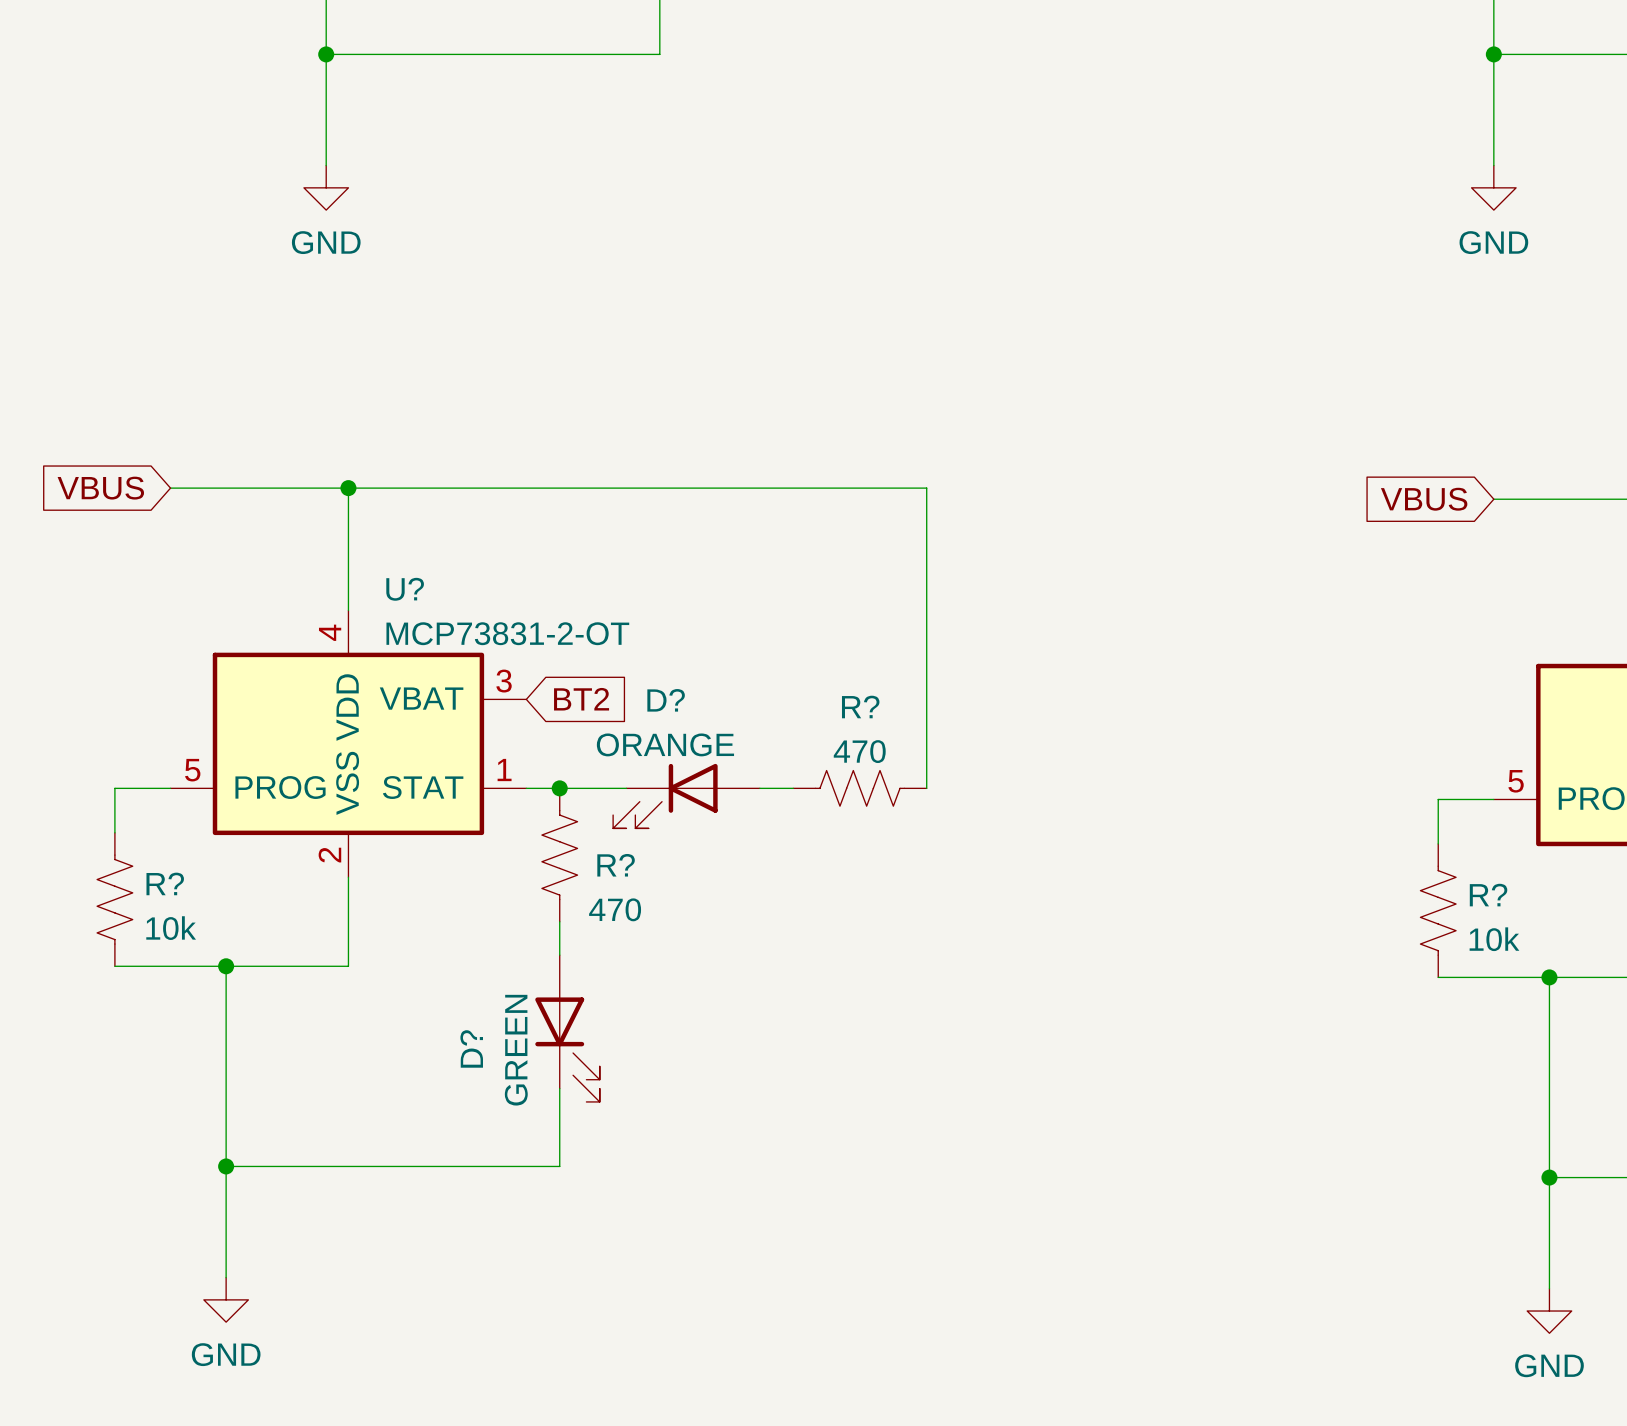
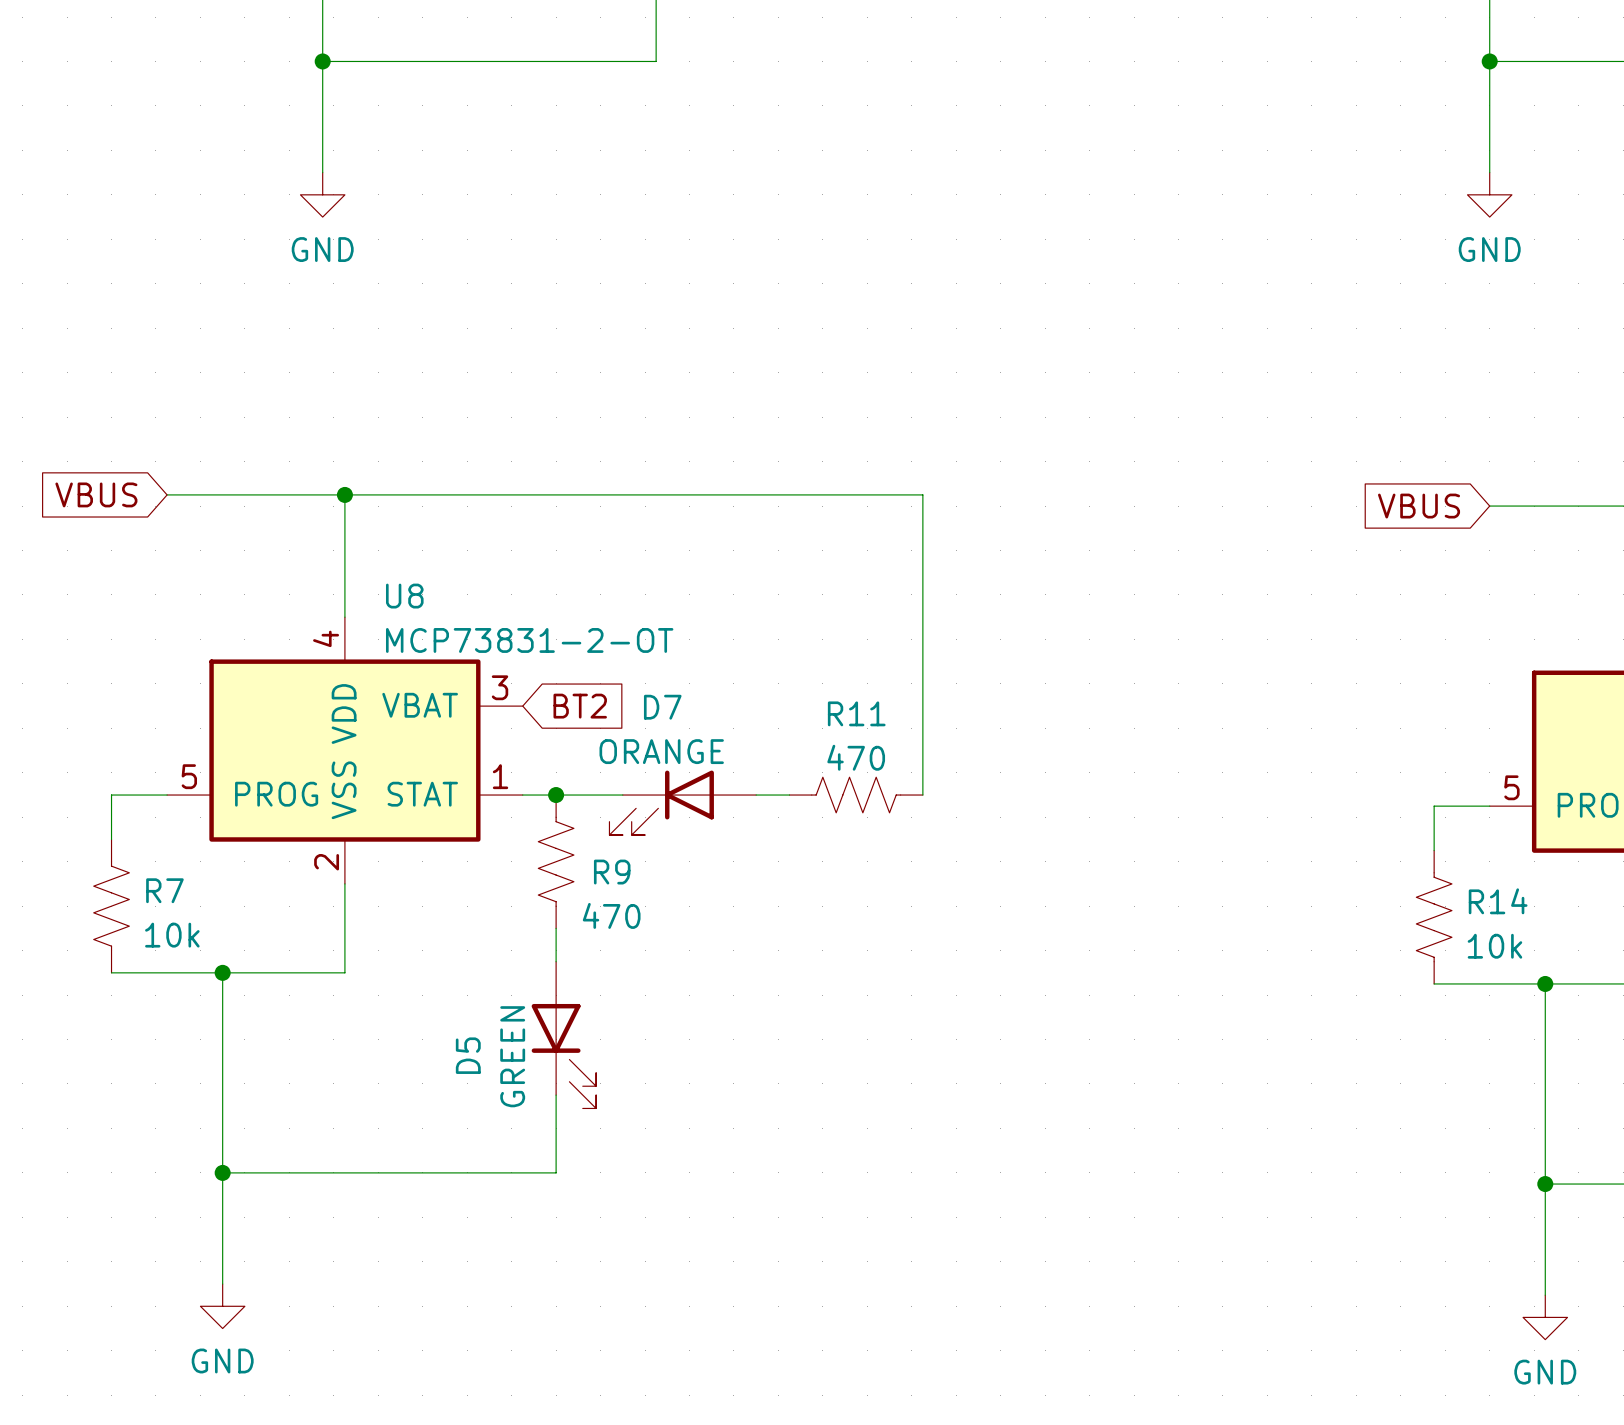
U? name: U? (405, 589) -> U8 (404, 596)
D? name: D? (666, 700) -> D7 (662, 707)
R? name: R? (860, 707) -> R11 (856, 713)
R? name: R? (616, 865) -> R9 (612, 872)
R? name: R? (165, 883) -> R7 (164, 890)
R? name: R? (1488, 895) -> R14 (1498, 901)
D? name: D? (471, 1048) -> D5 (468, 1055)

